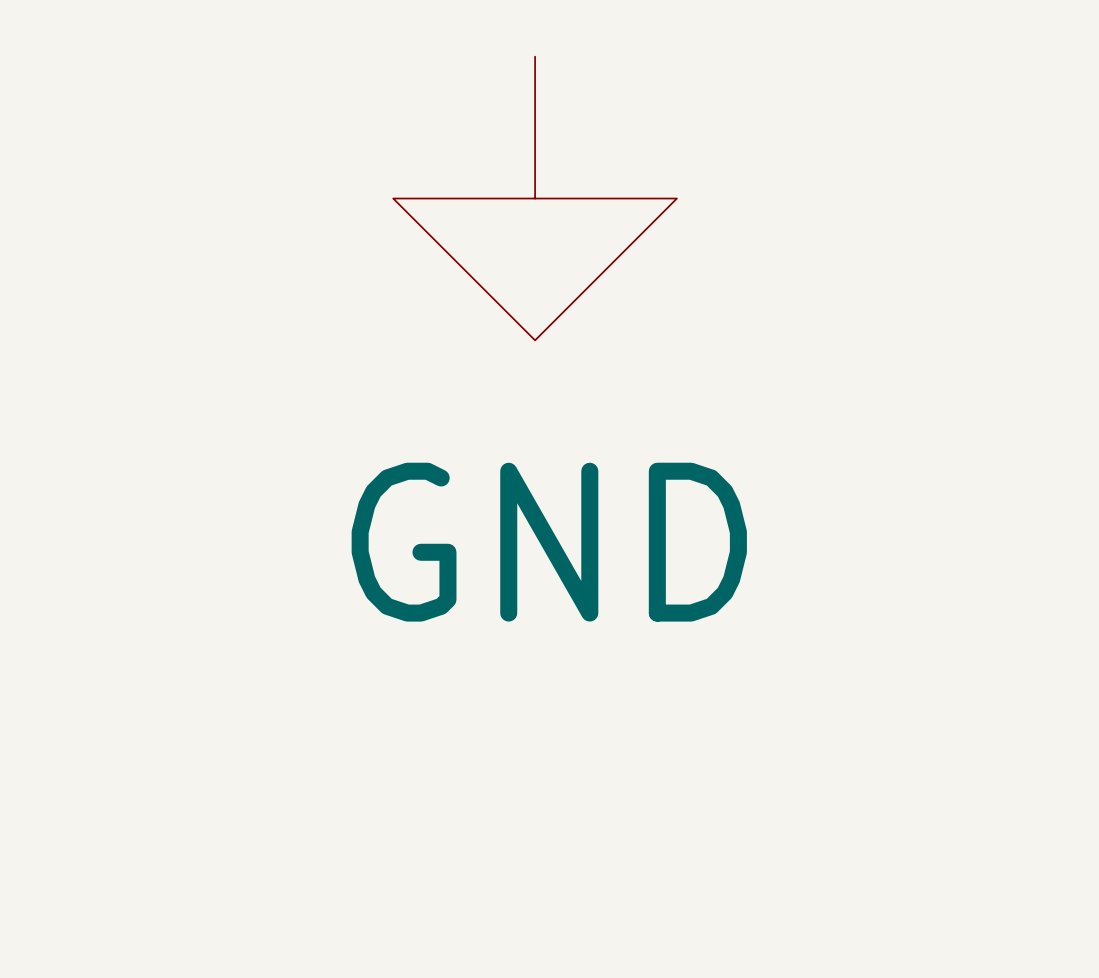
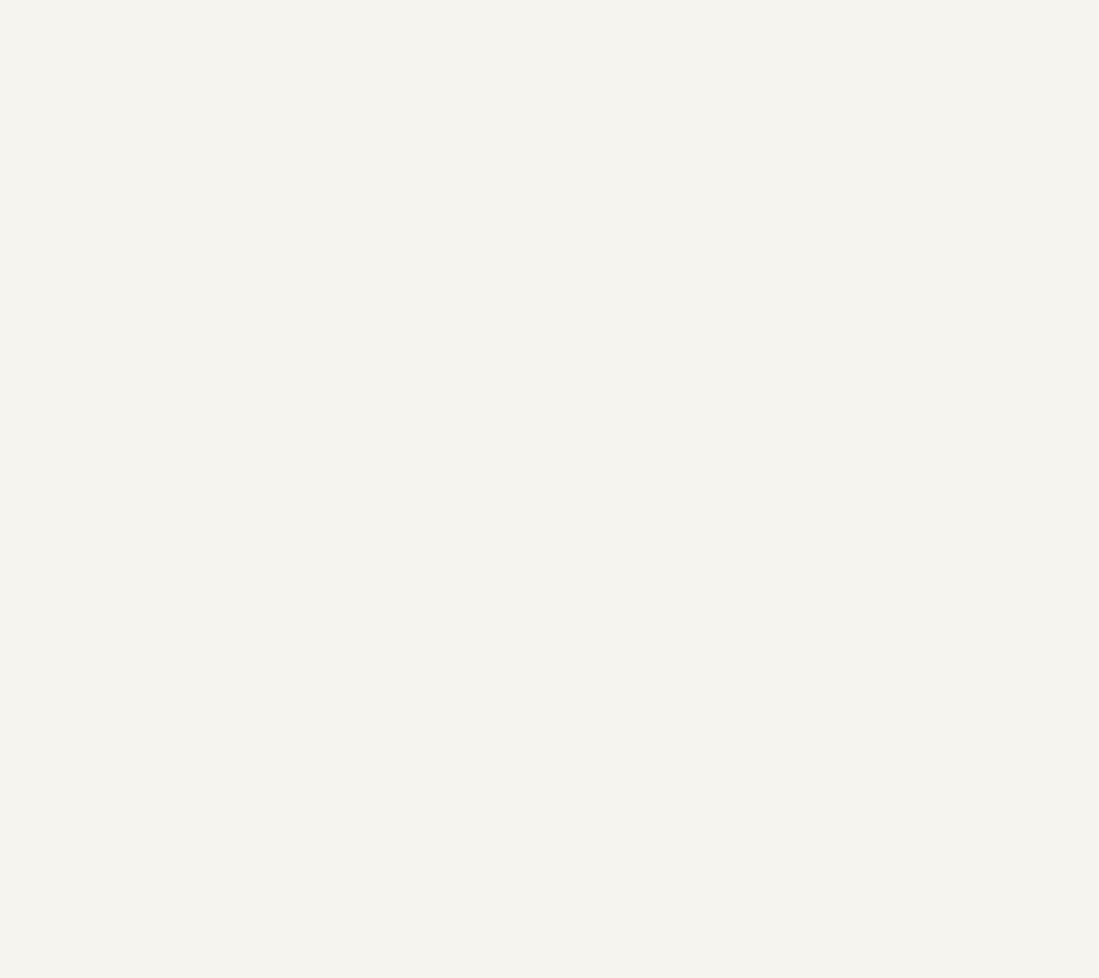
power symbol: GND (535, 198) -> none

